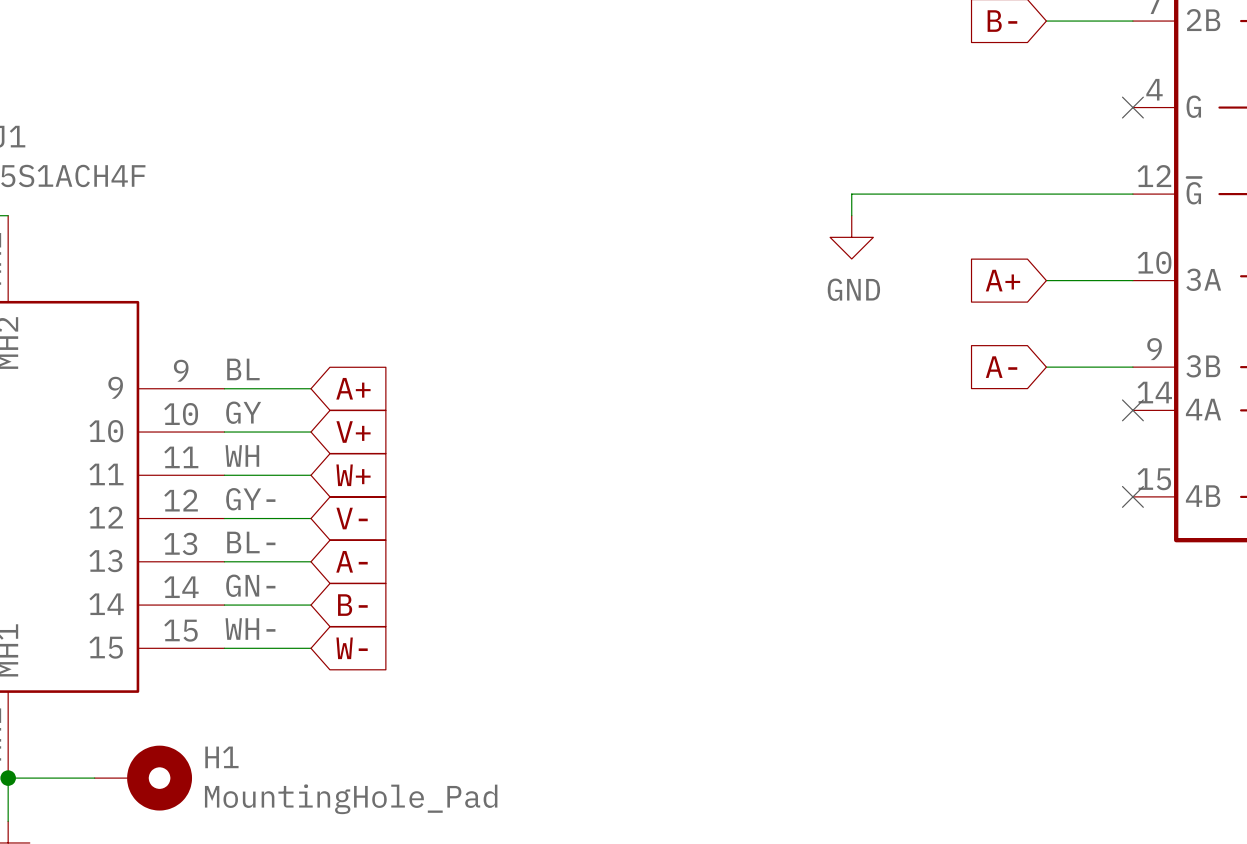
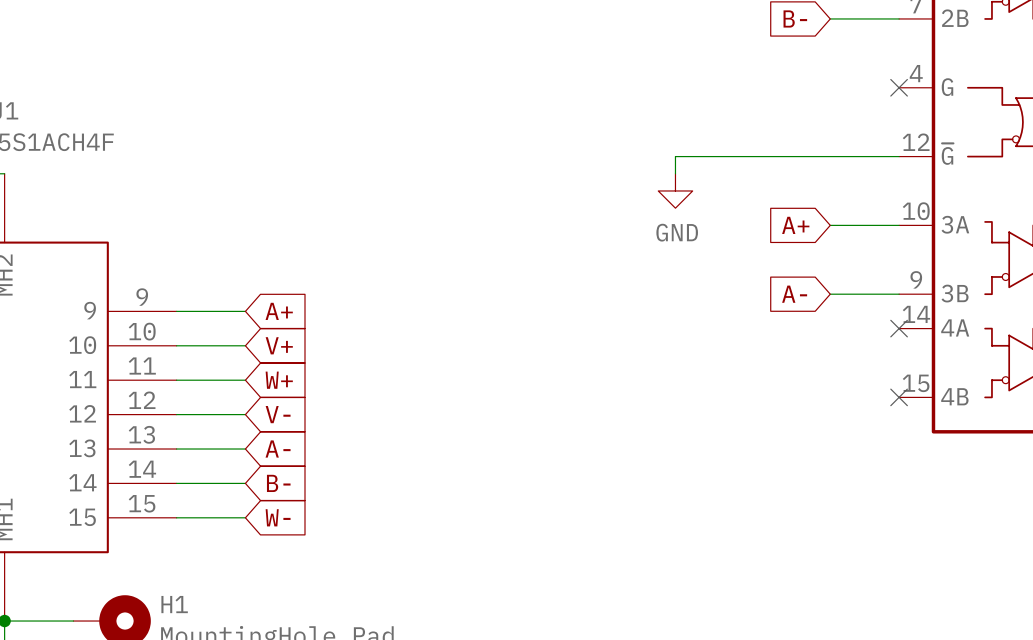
label: BL (243, 369) -> none
label: GY (243, 412) -> none
label: WH (242, 455) -> none
label: GY- (250, 499) -> none
label: BL- (251, 542) -> none
label: GN- (250, 585) -> none
label: WH- (250, 629) -> none

